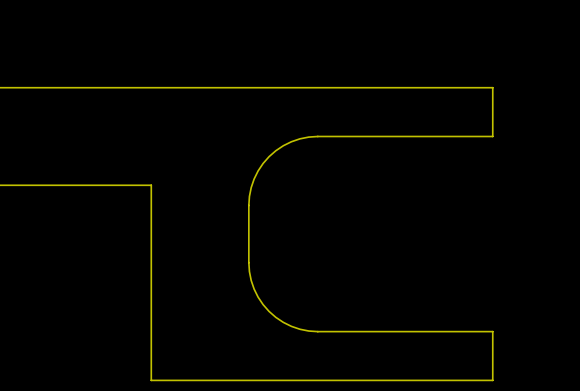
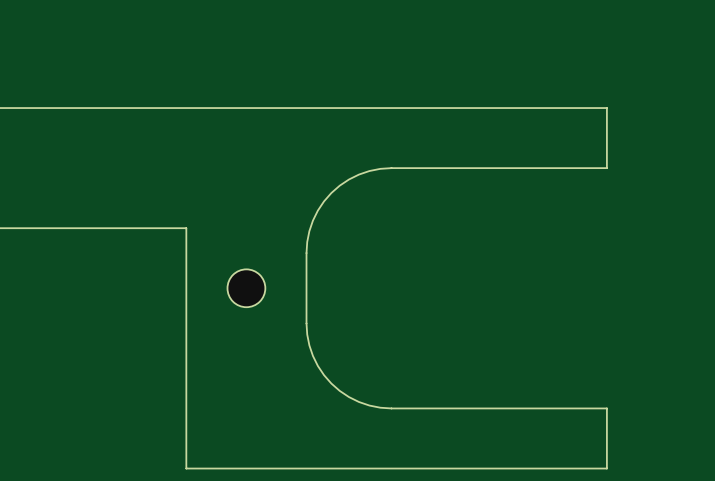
hole: none -> (246, 288)

